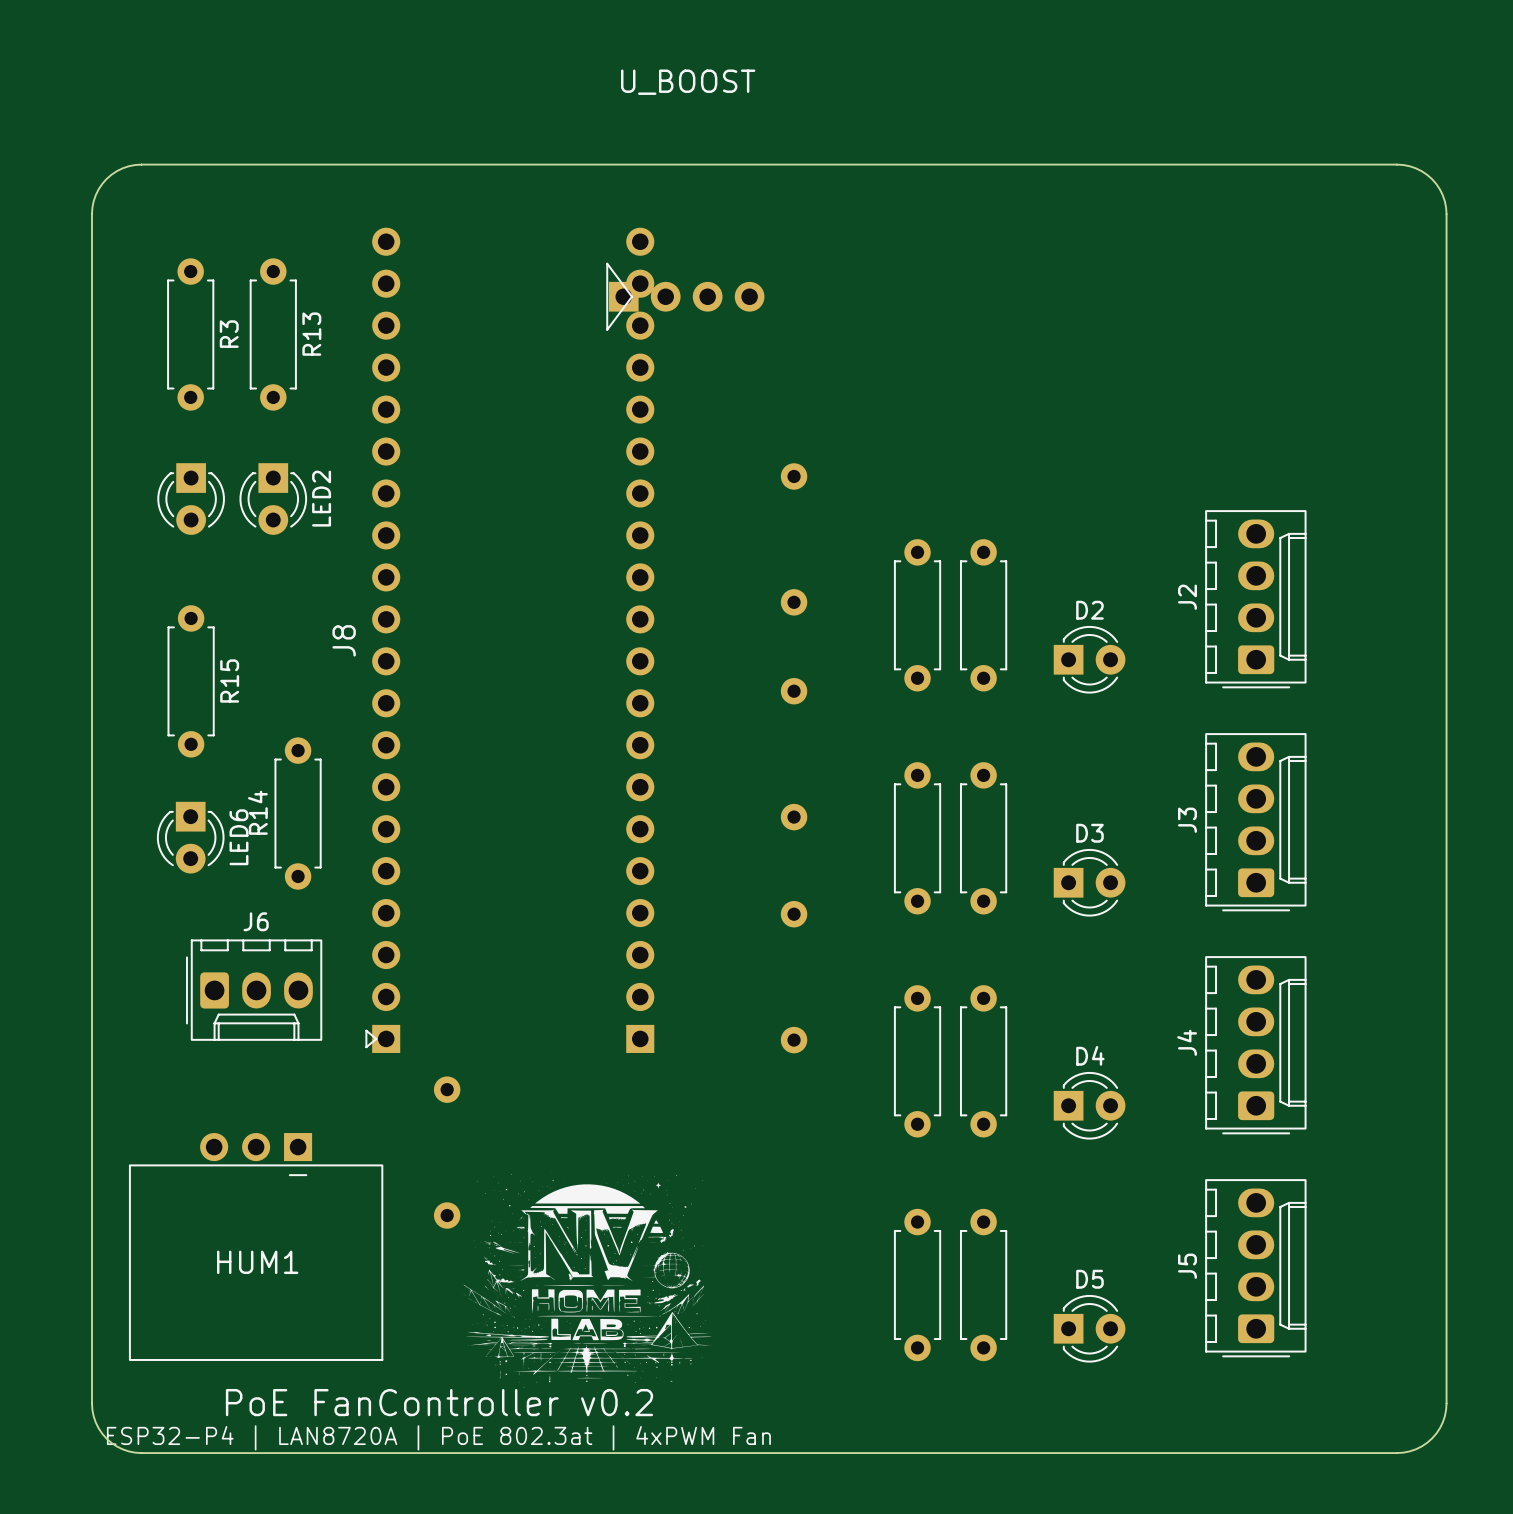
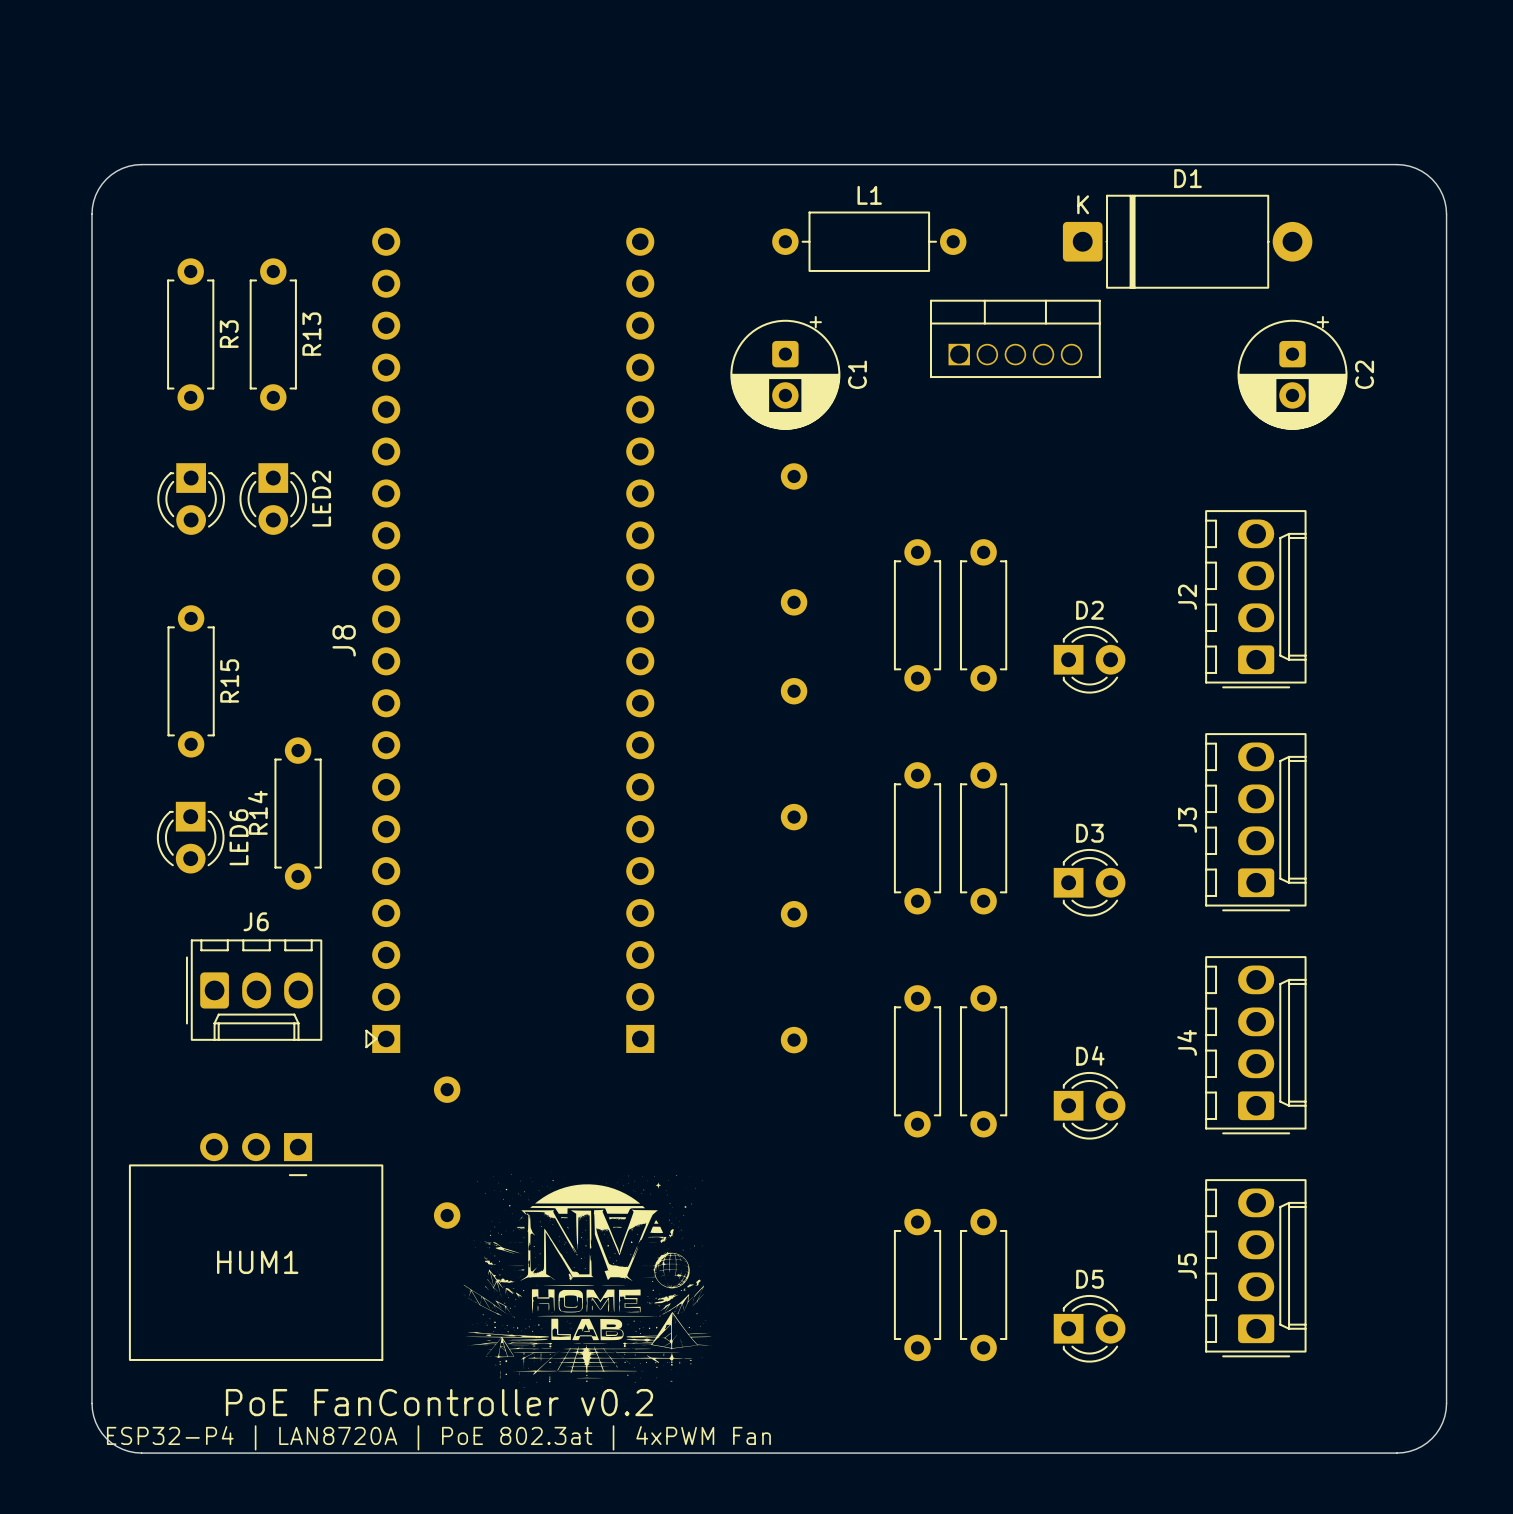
L1: none -> (869, 241)
D1: none -> (1187, 241)
U_BOOST: (685, 296) -> none
part: none -> (1015, 338)
C1: none -> (785, 372)
C2: none -> (1292, 372)

